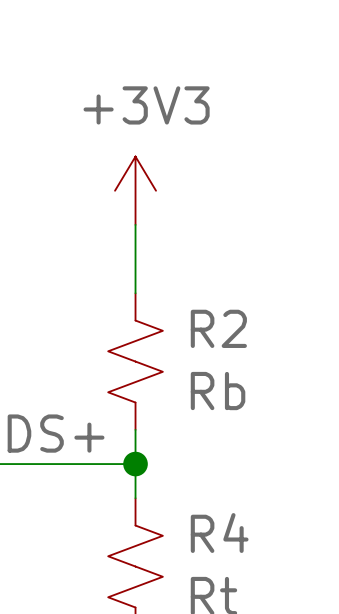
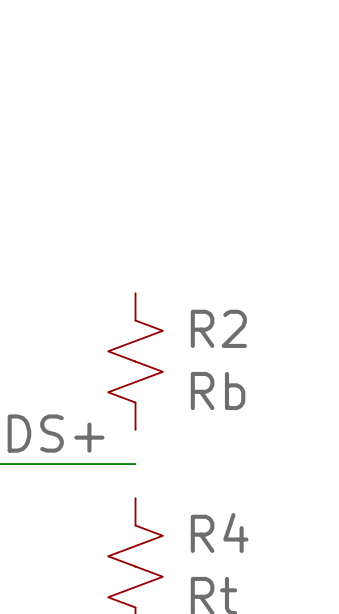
power symbol: +3V3 (135, 190) -> none
wire: (135, 224) (135, 293) -> none
wire: (135, 429) (135, 498) -> none
junction: (135, 464) -> none

